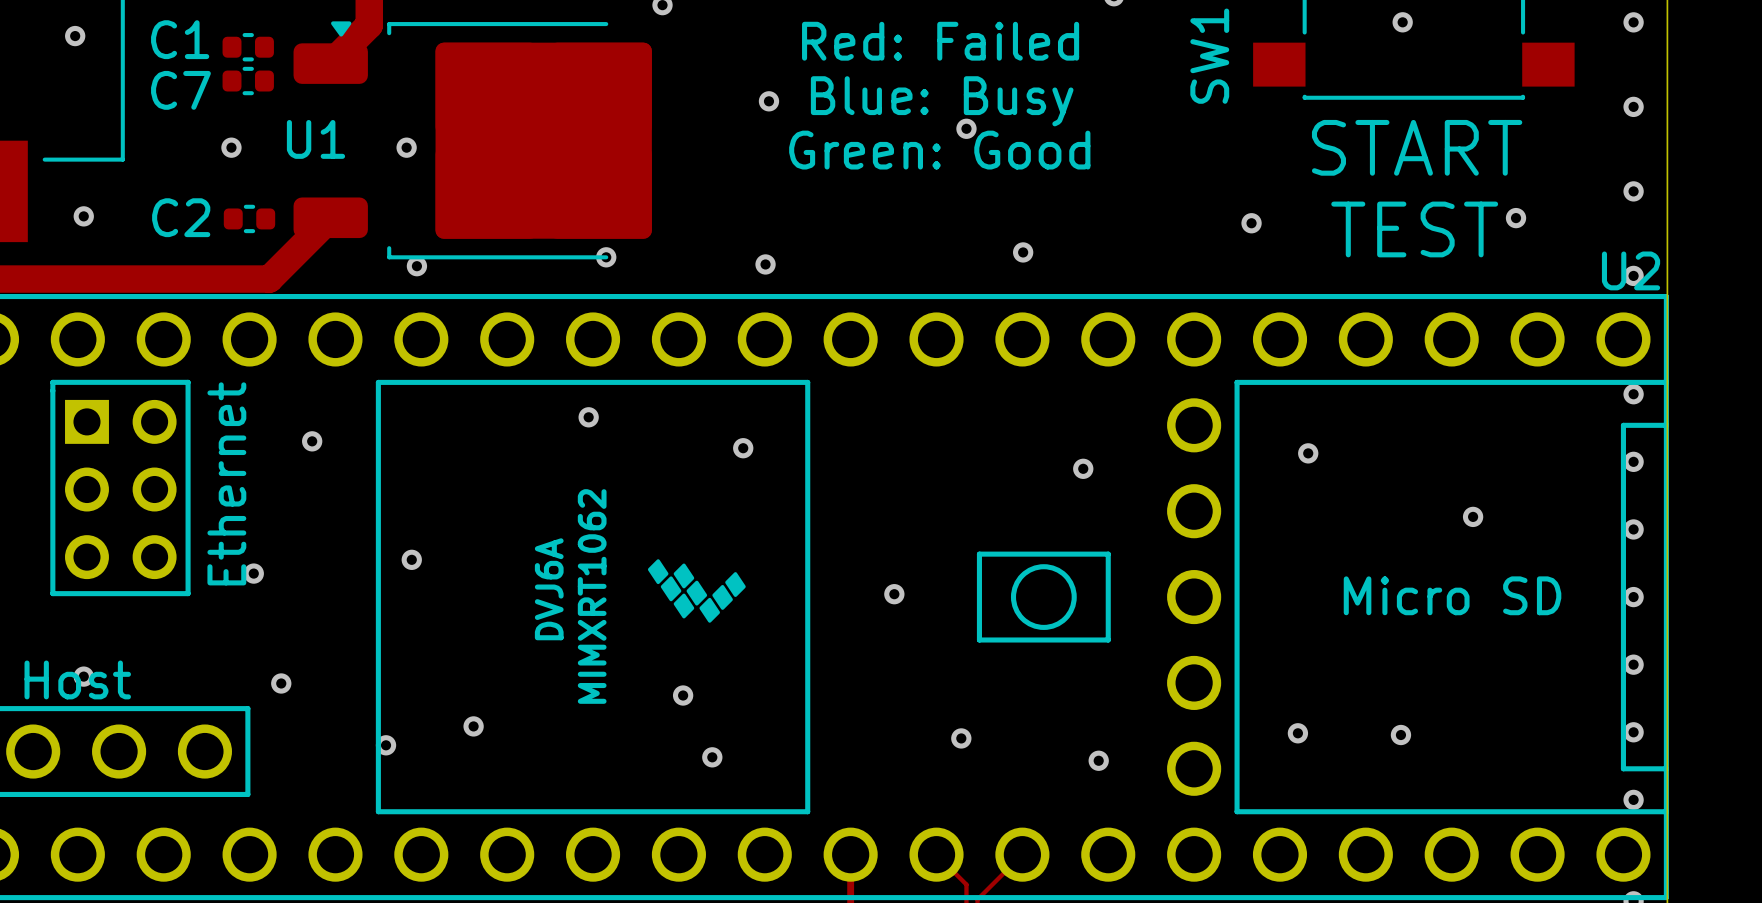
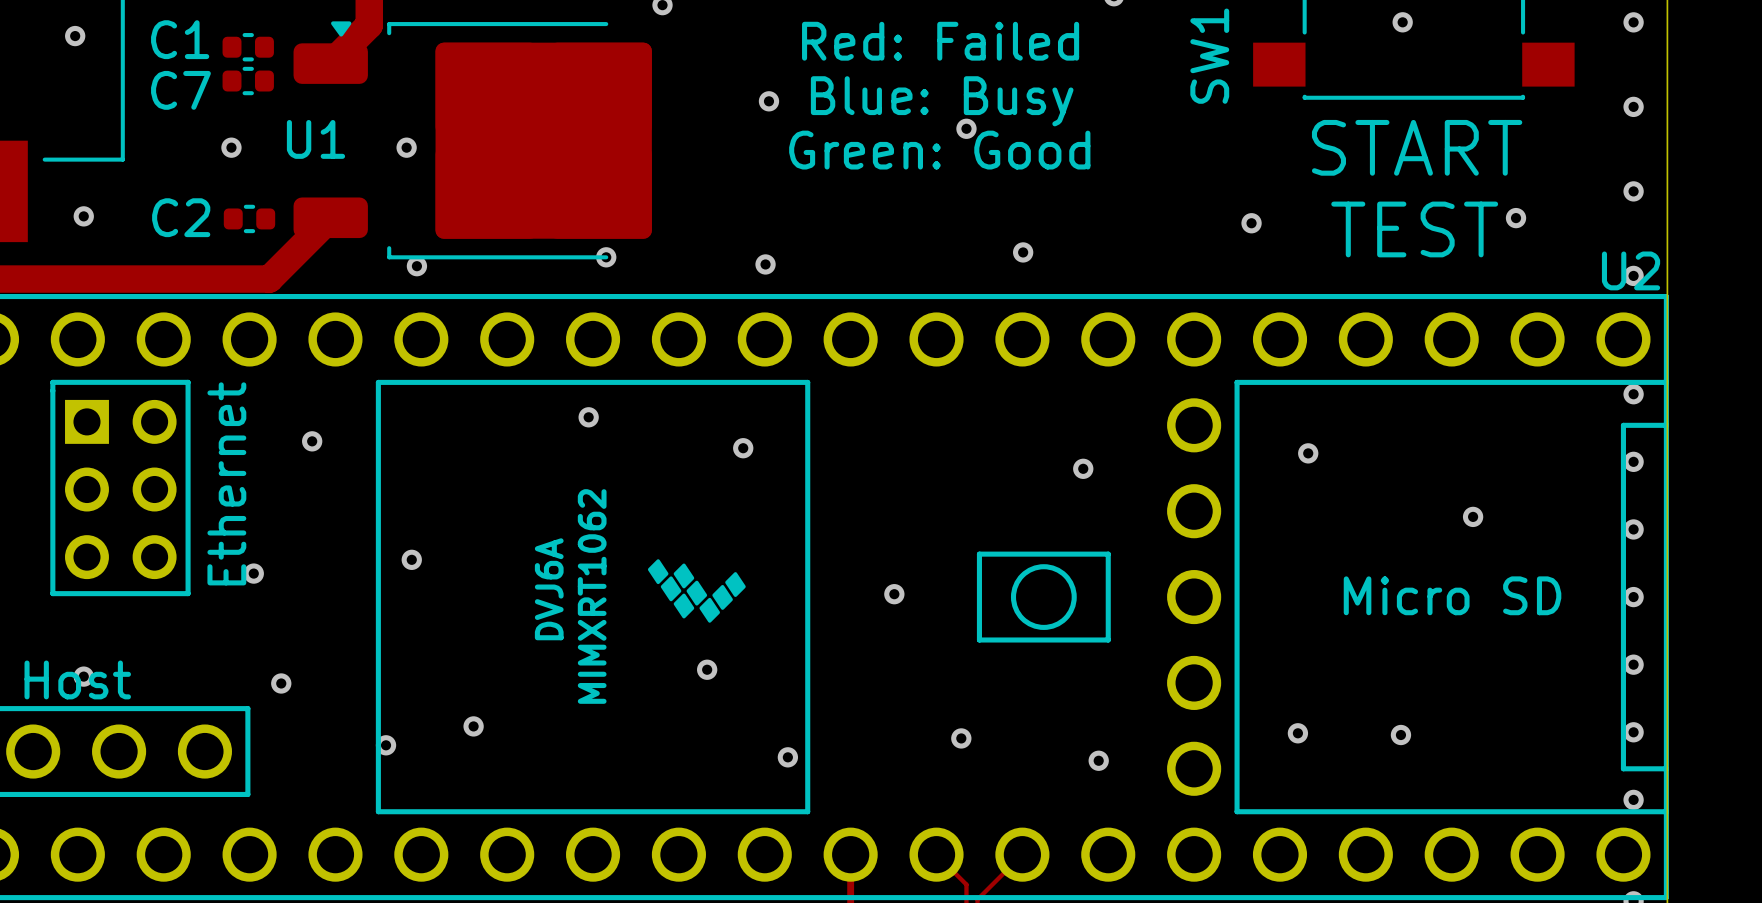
via position: (683, 695) -> (707, 669)
via: (712, 757) -> none
via: none -> (787, 757)

